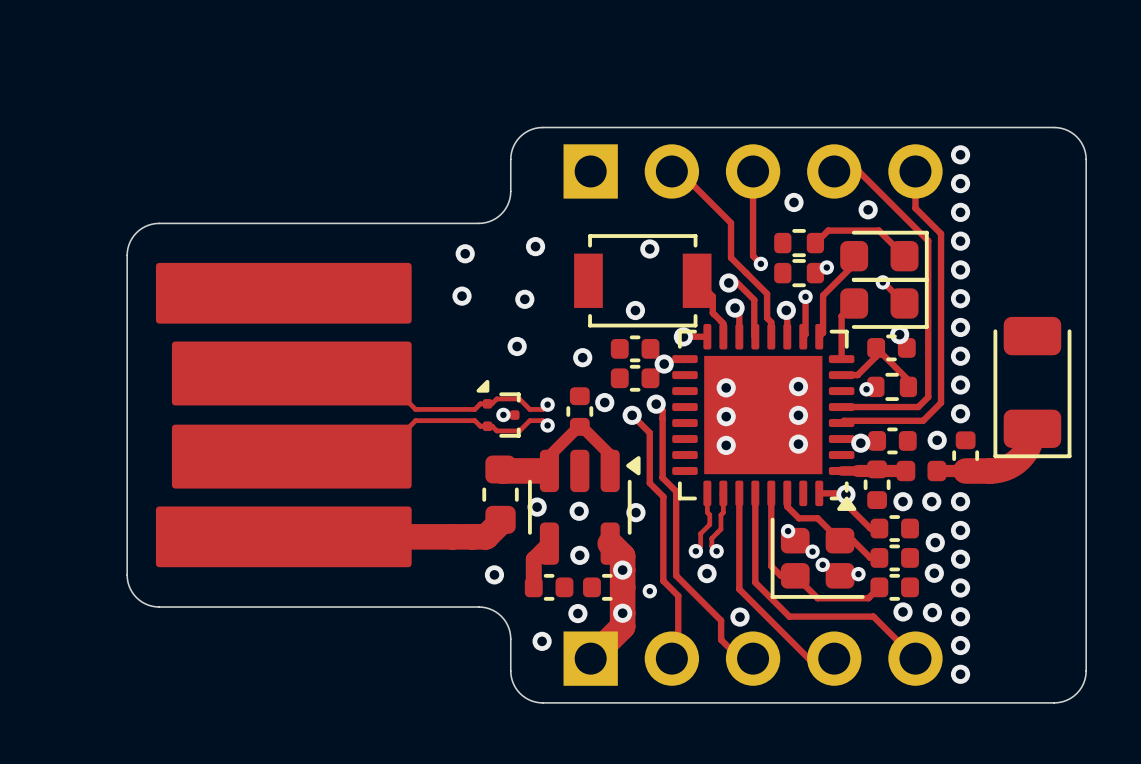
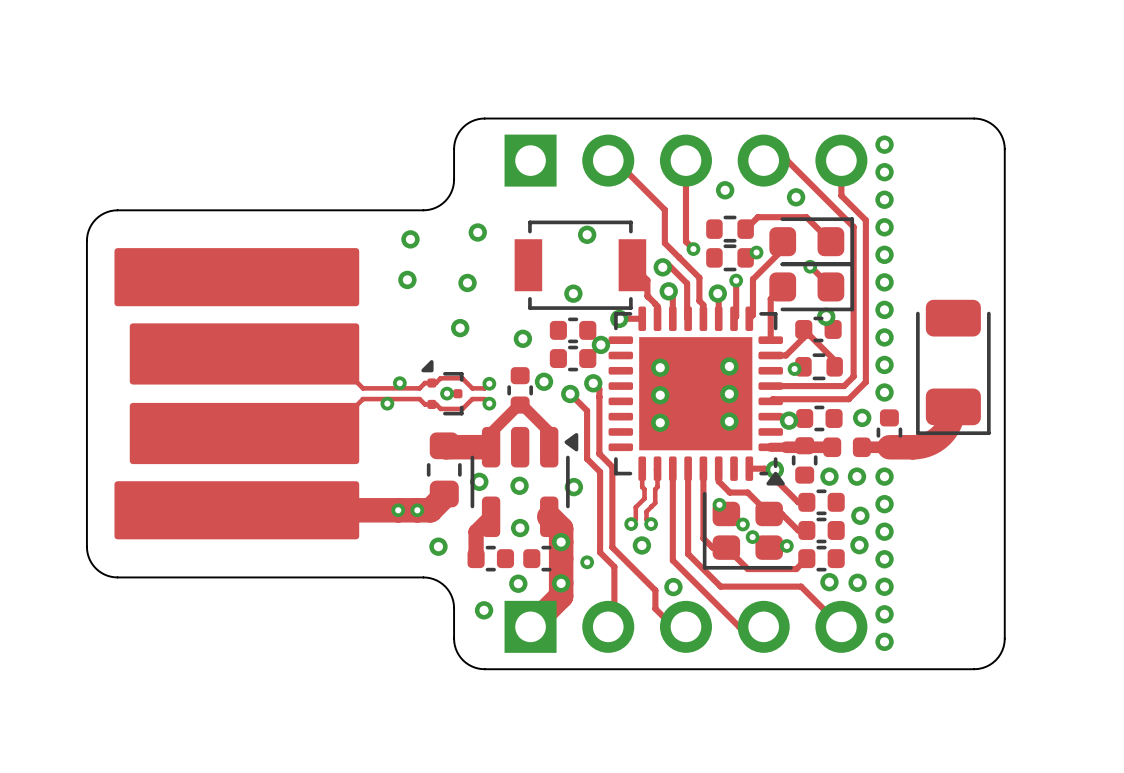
via: none -> (399, 383)
via: none -> (387, 403)
via: none -> (398, 510)
via: none -> (417, 510)

